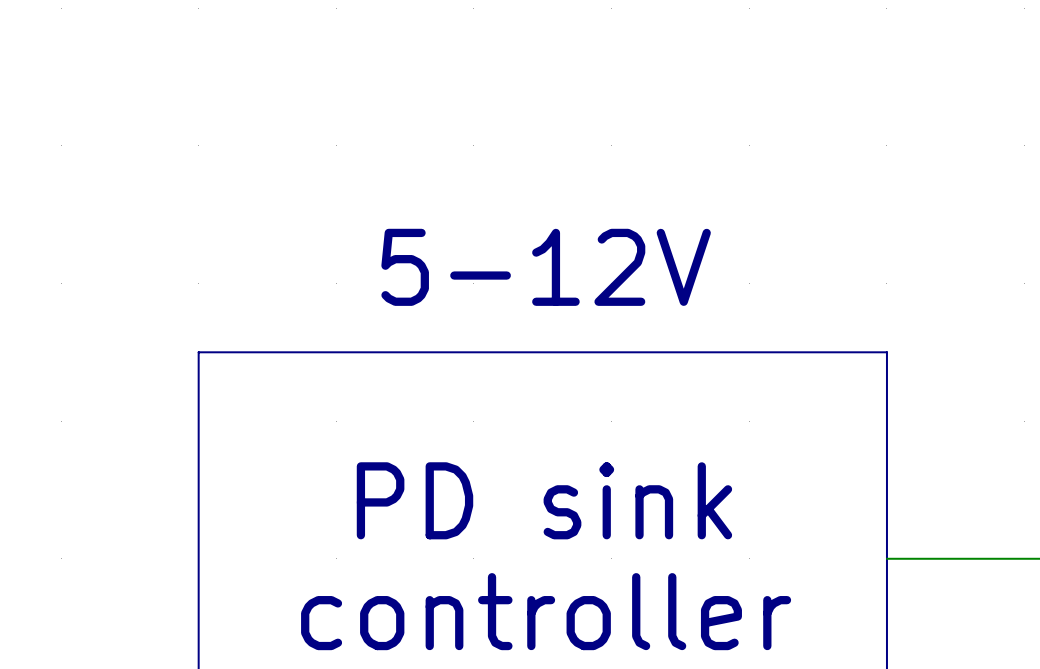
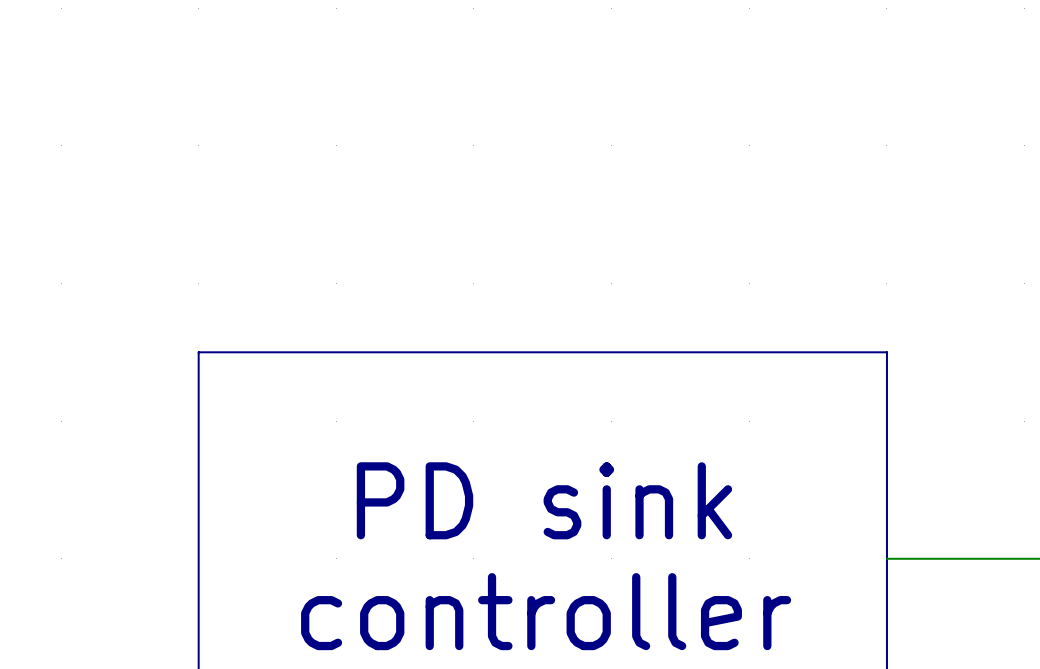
text: 5-12V (546, 267) -> none

